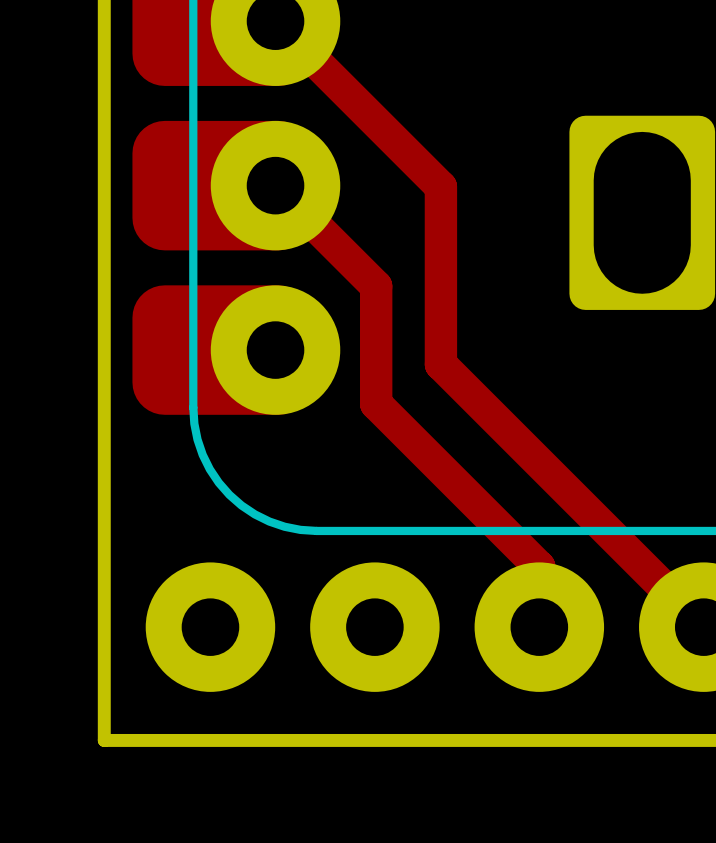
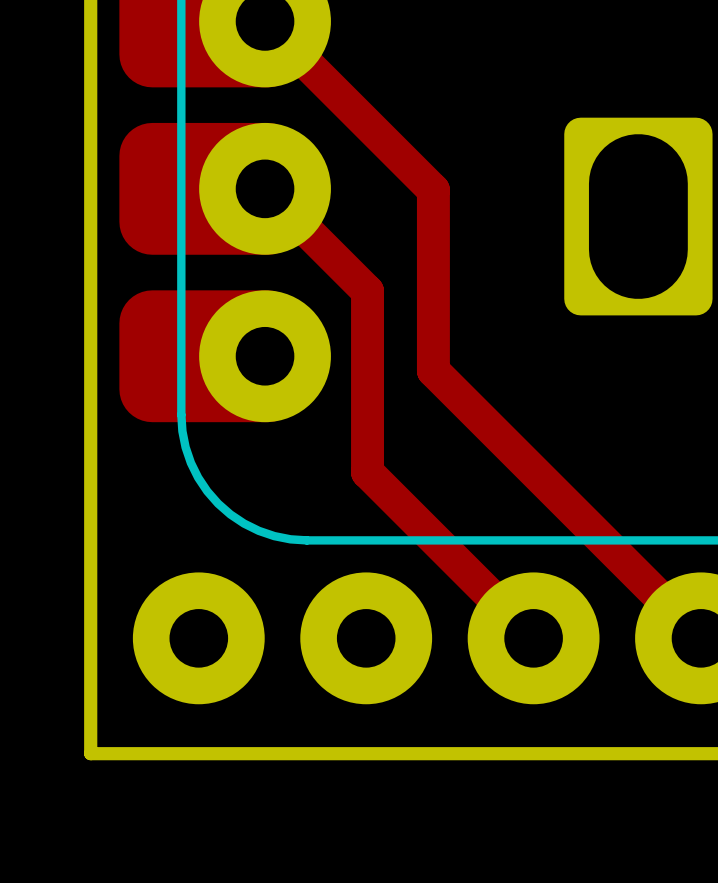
track: (376, 403) (539, 566) (539, 627) -> (367, 410) (367, 472) (533, 638)

